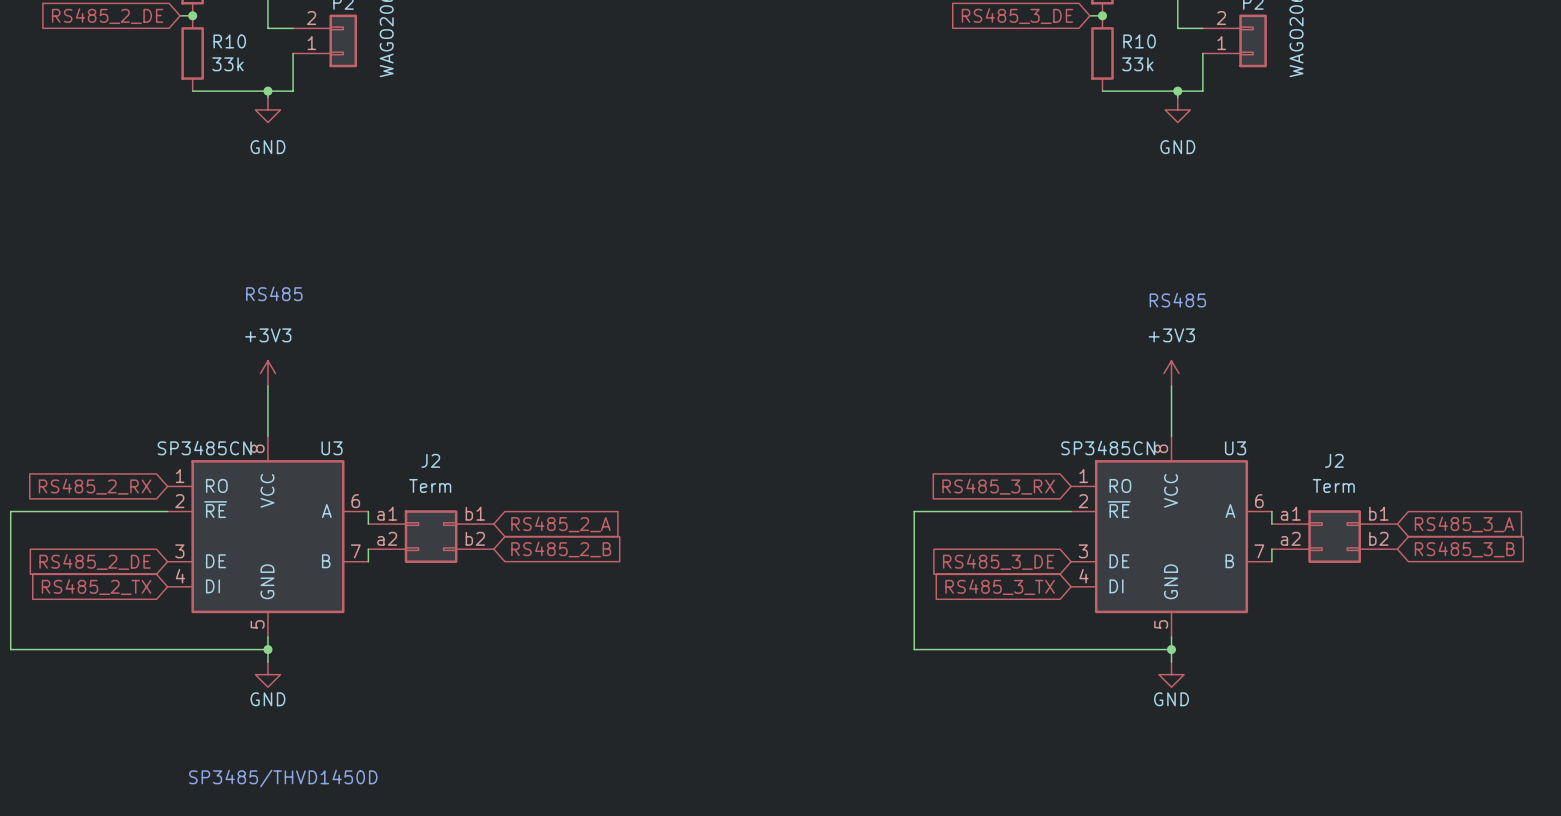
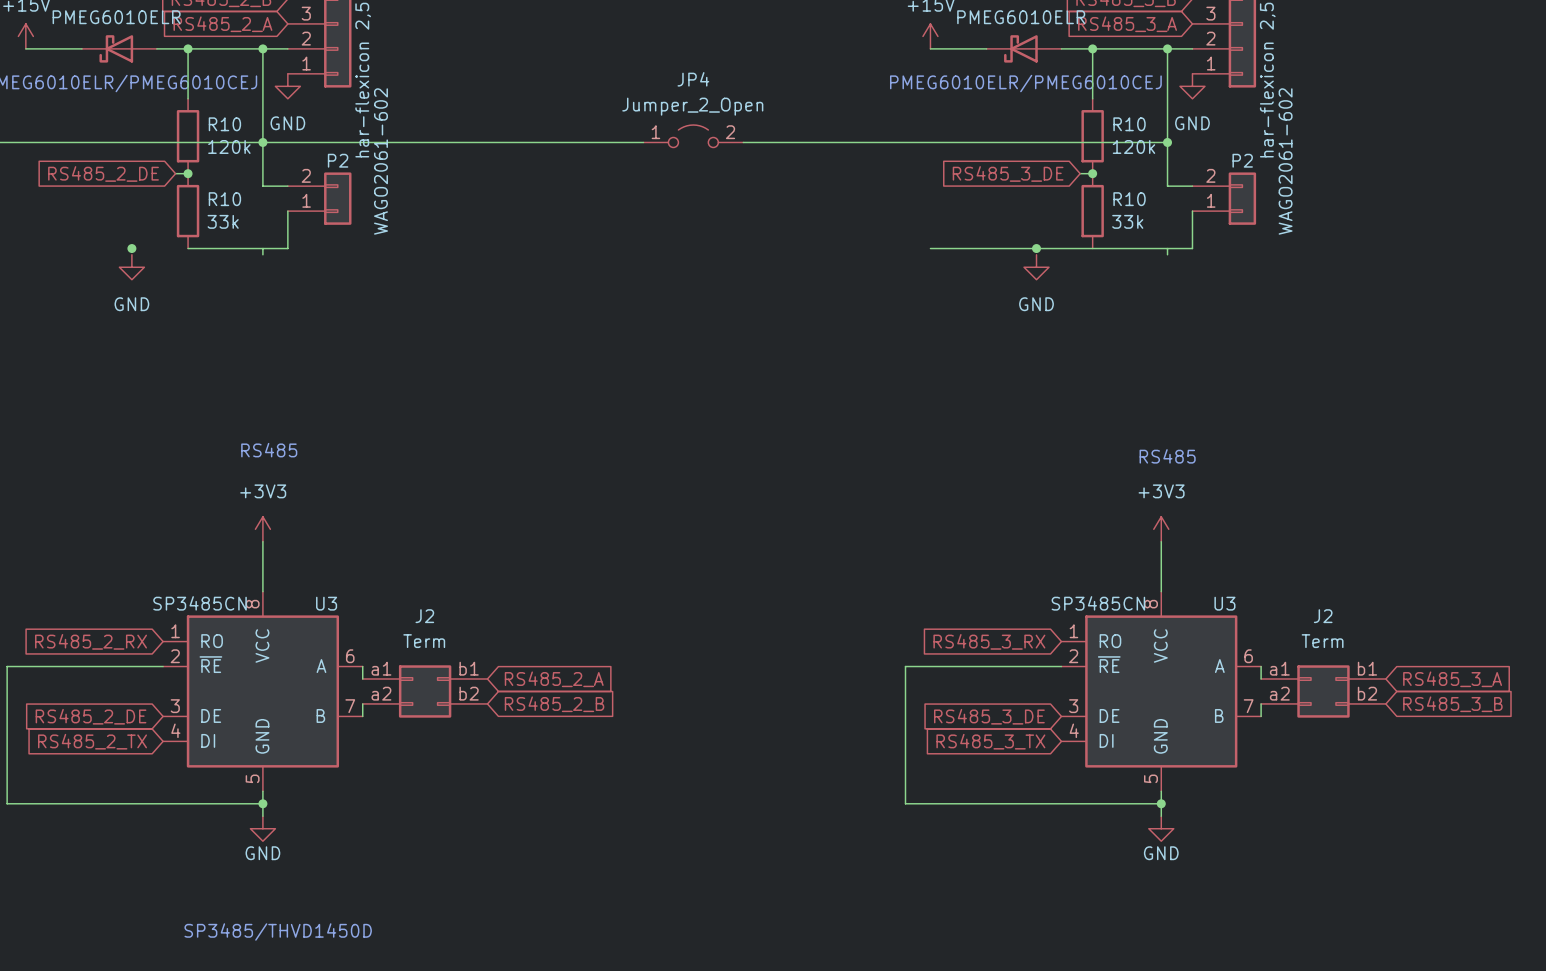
junction: none -> (131, 248)
junction: (267, 91) -> none
wire: none -> (930, 248) (1092, 248)
junction: none -> (1036, 248)
junction: (1177, 91) -> none
power symbol position: GND (267, 109) -> GND (131, 267)
power symbol position: GND (1177, 109) -> GND (1036, 267)

